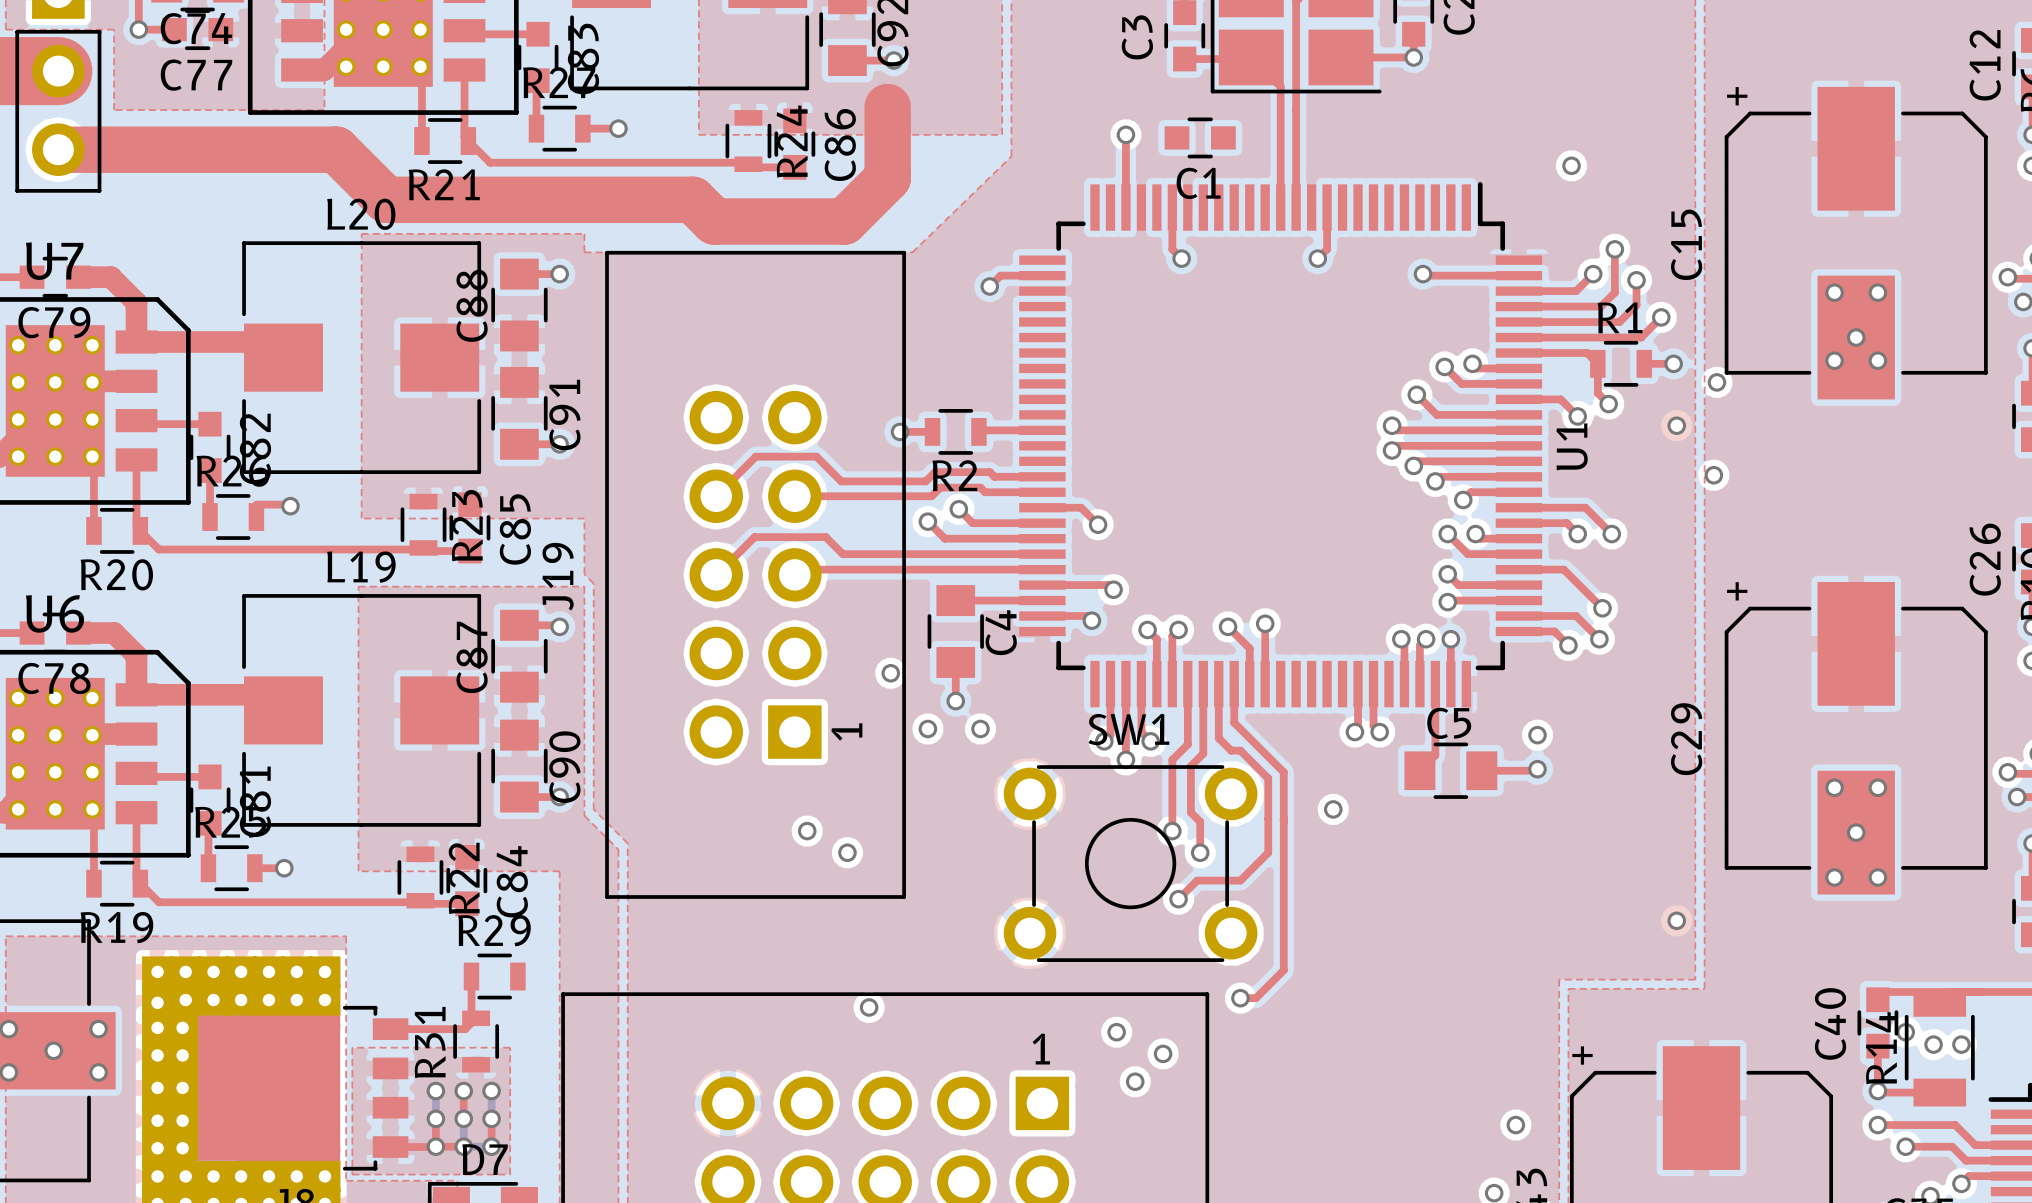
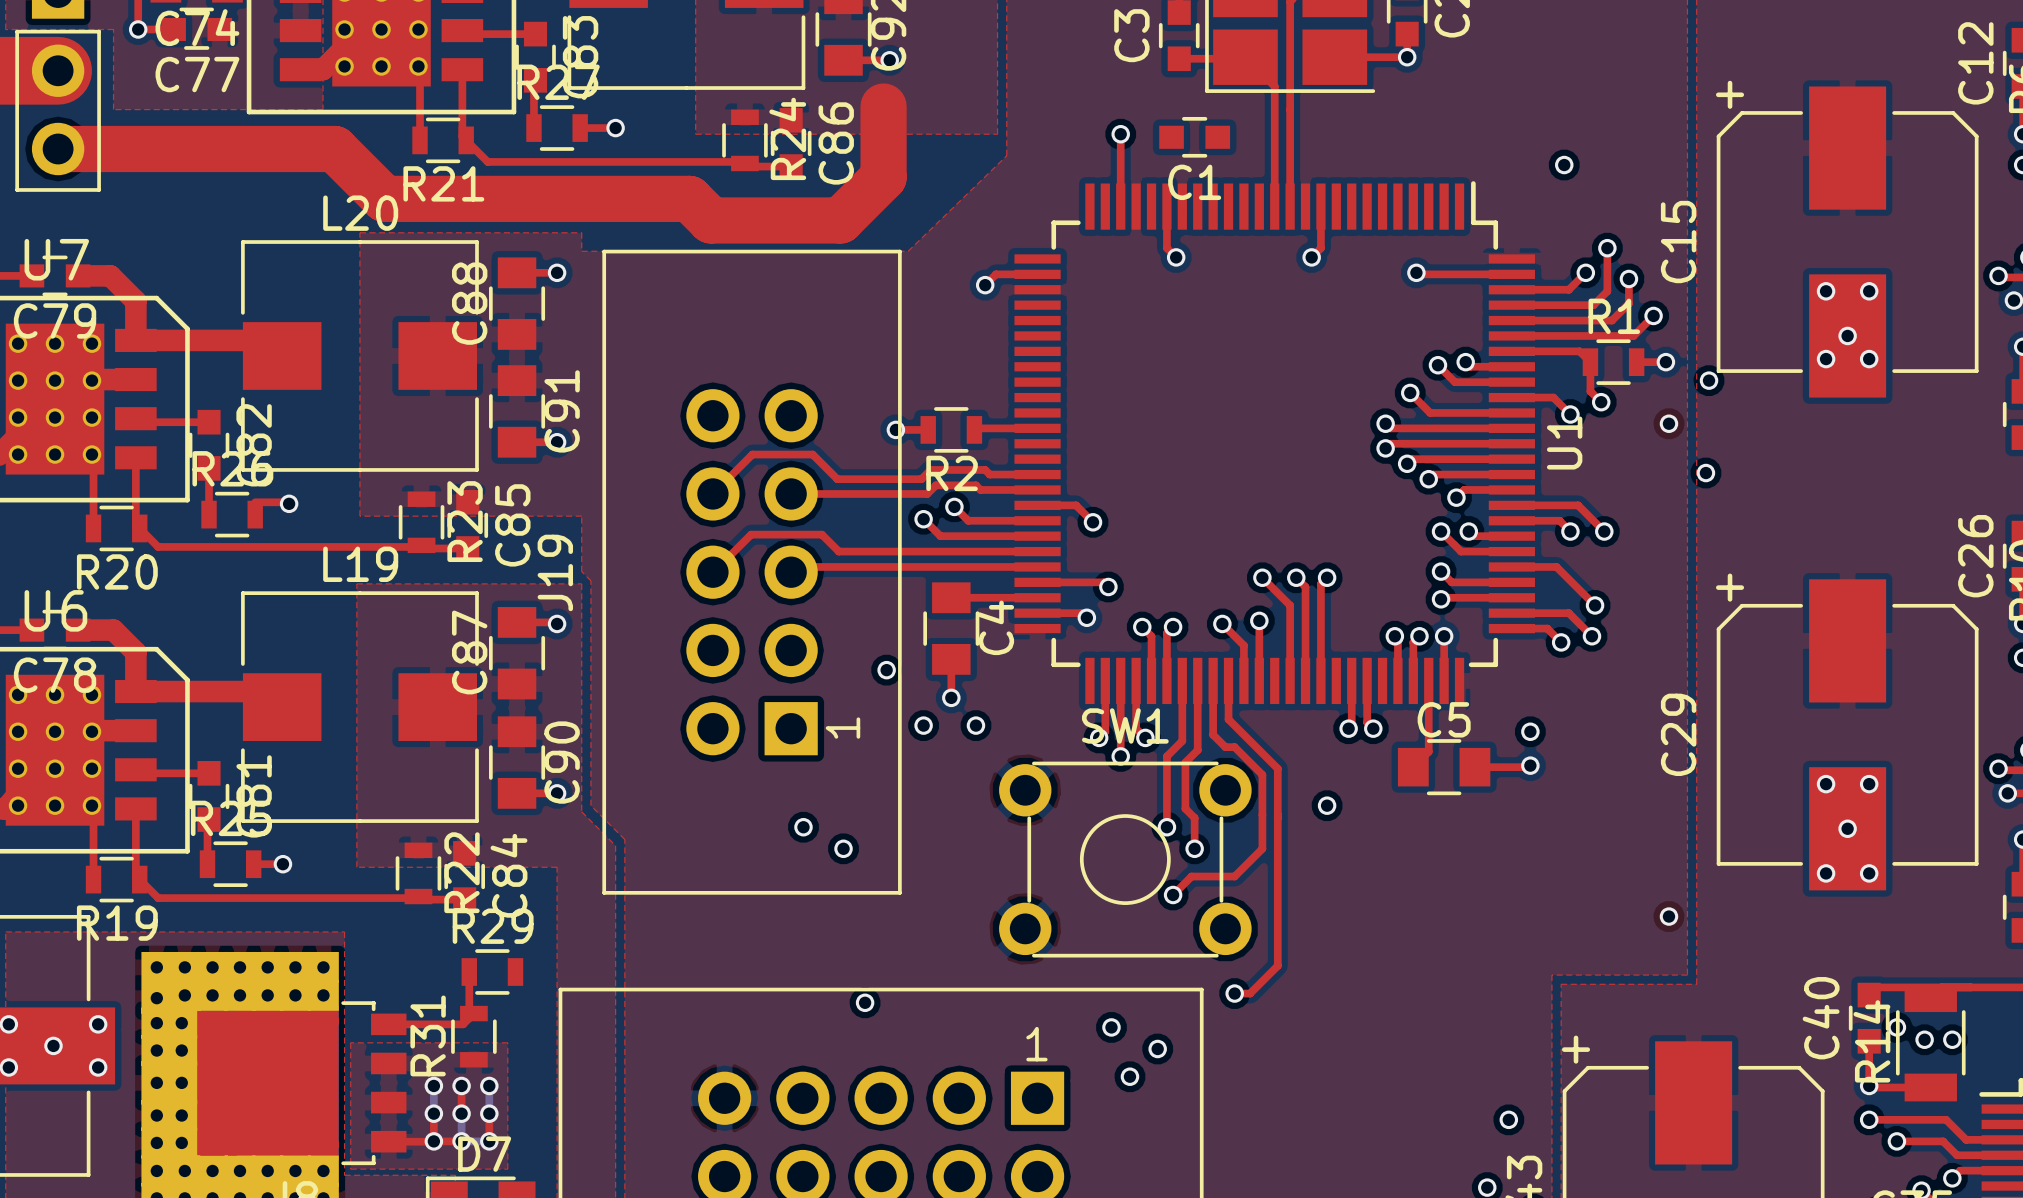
top track: none -> (1262, 577) (1290, 605) (1290, 680)
via: none -> (1262, 577)
top track: none -> (1296, 577) (1305, 586) (1305, 680)
via: none -> (1296, 577)
top track: none -> (1327, 577) (1320, 583) (1320, 680)
via: none -> (1327, 577)

